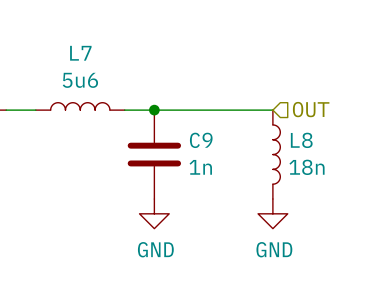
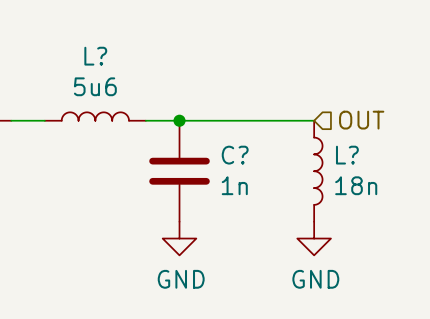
L7 name: L7 (80, 53) -> L? (95, 56)
C9 name: C9 (201, 140) -> C? (235, 155)
L8 name: L8 (301, 140) -> L? (347, 155)

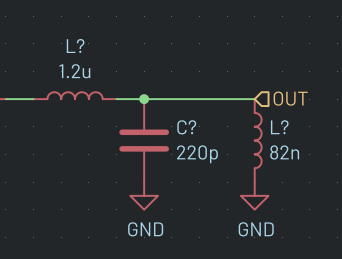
L? value: 5u6 (95, 86) -> 1.2u (74, 71)
C? value: 1n (234, 185) -> 220p (197, 154)
L? value: 18n (356, 185) -> 82n (284, 152)

